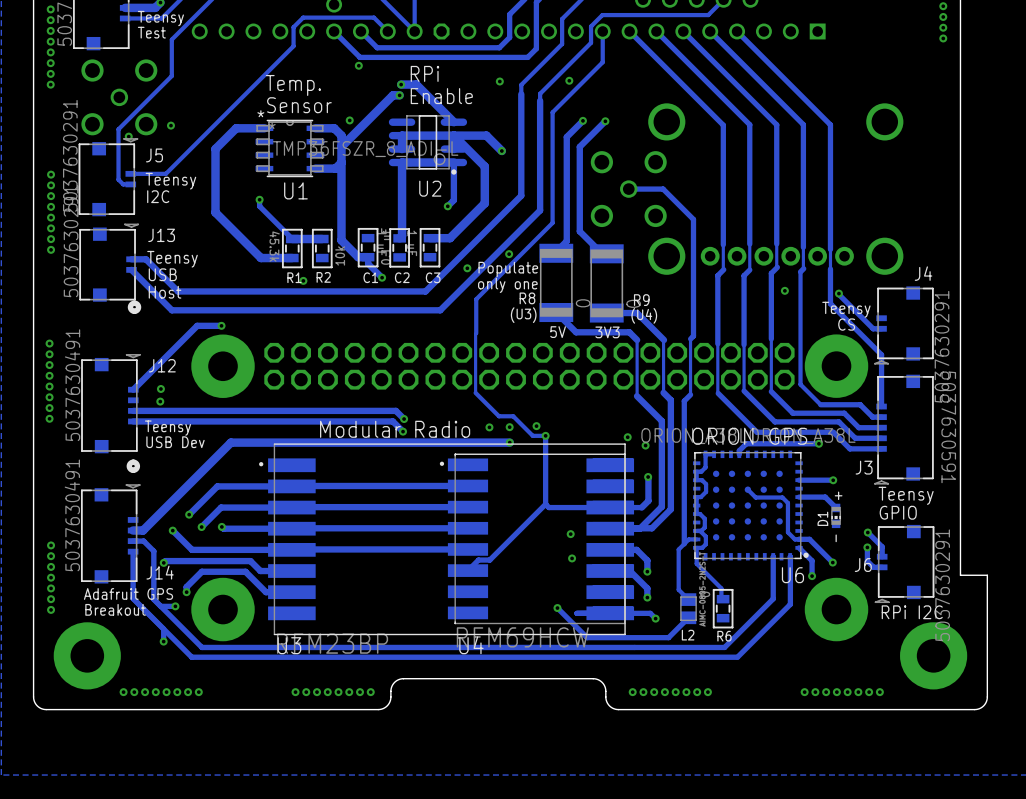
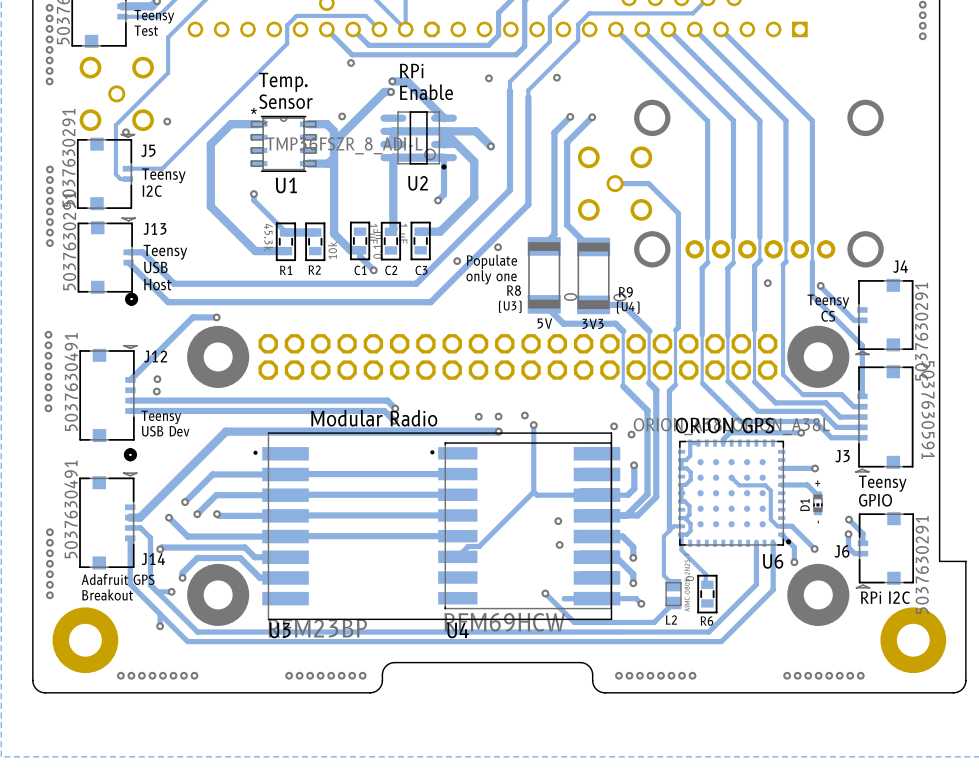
track: (602, 31) (602, 62) (552, 112) (552, 222) (476, 299) (476, 333) -> none
via: (303, 280) -> none
track: (476, 333) (475, 392) (498, 416) (513, 416) (532, 435) (545, 435) -> none

